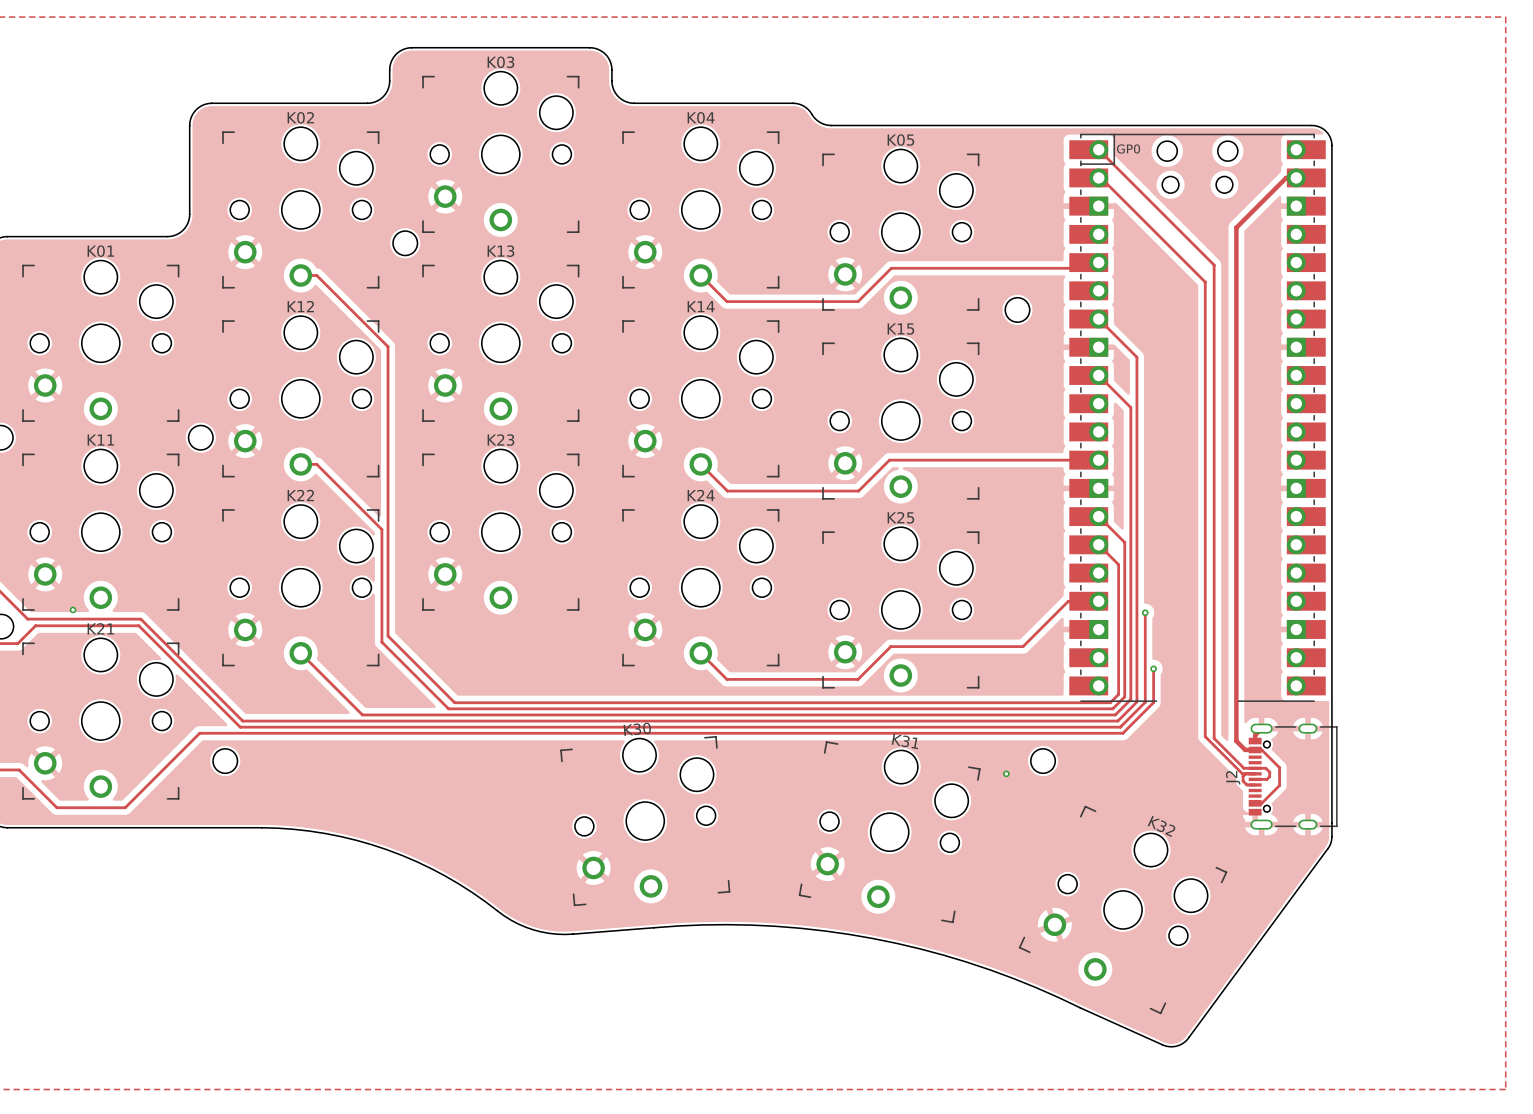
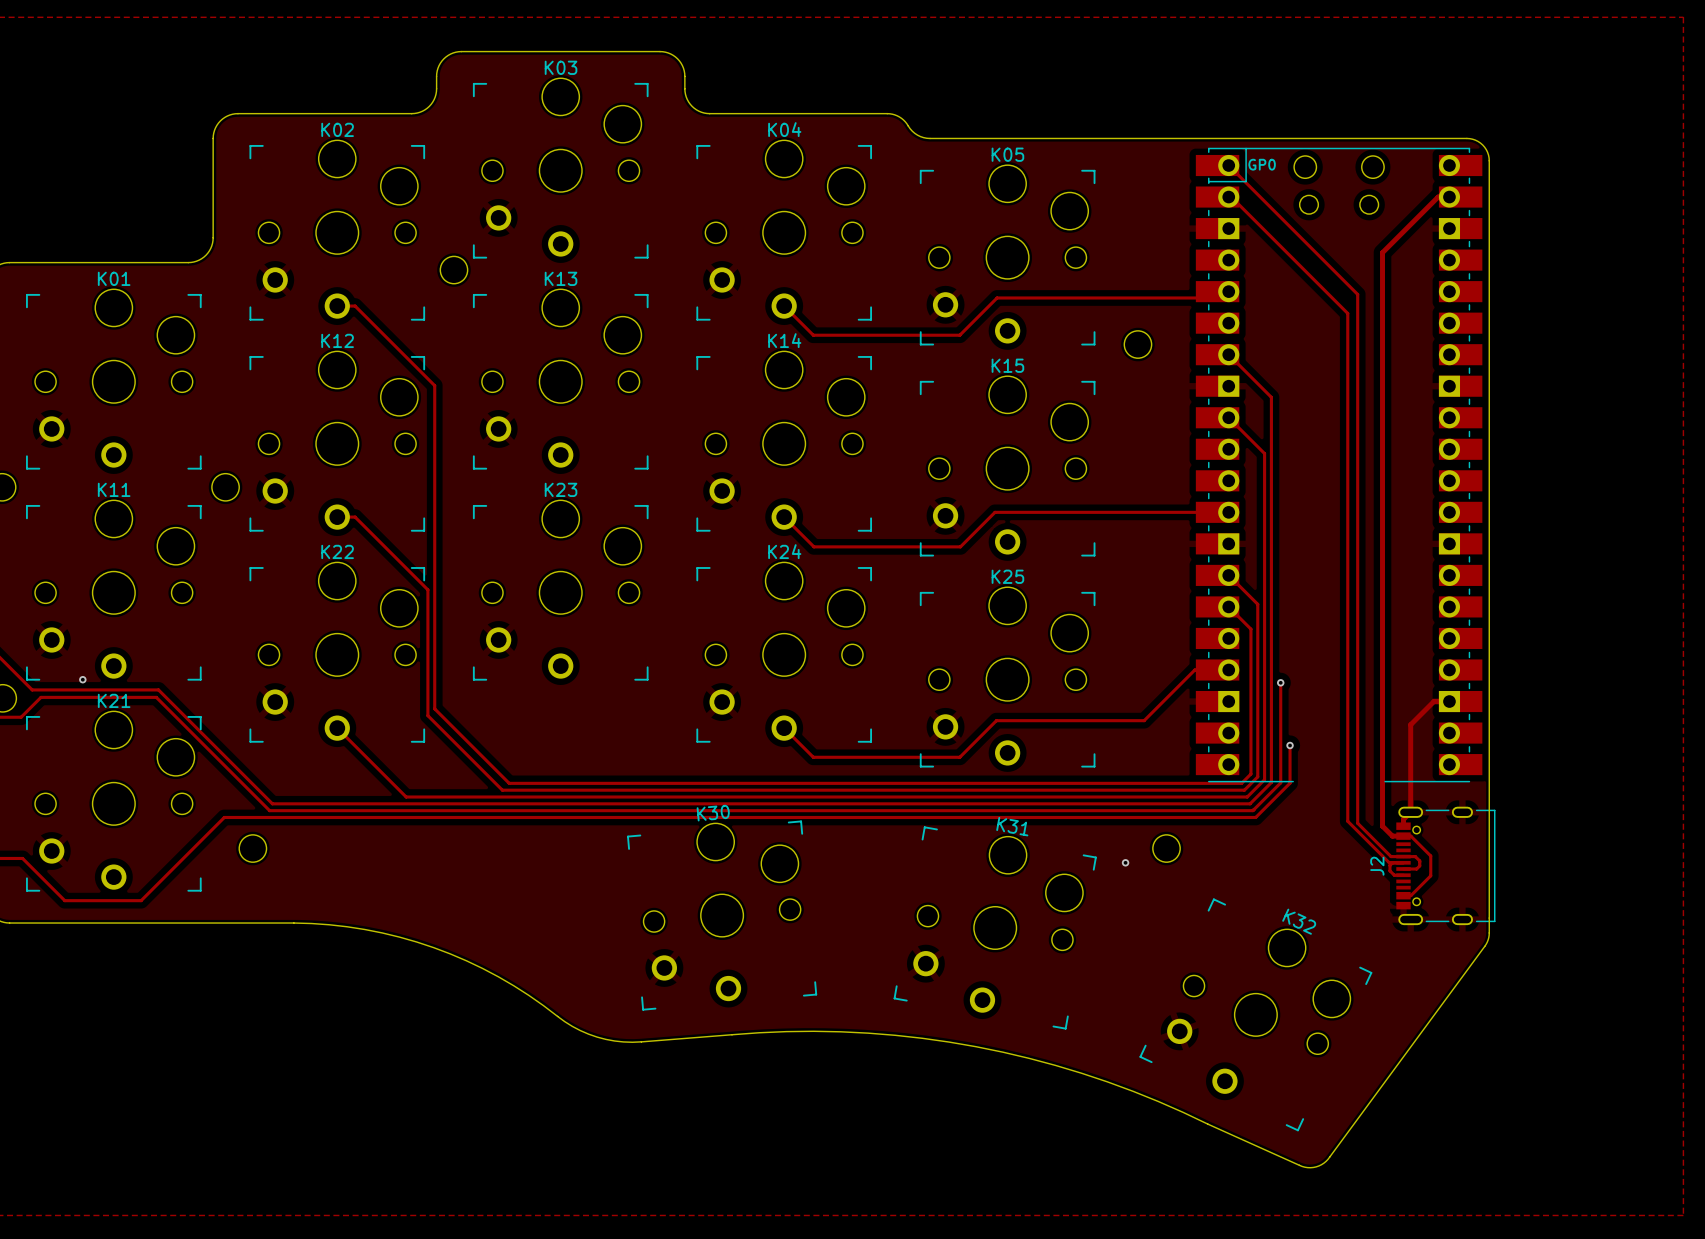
track: none -> (1449, 701) (1433, 701) (1410, 724) (1410, 812)

